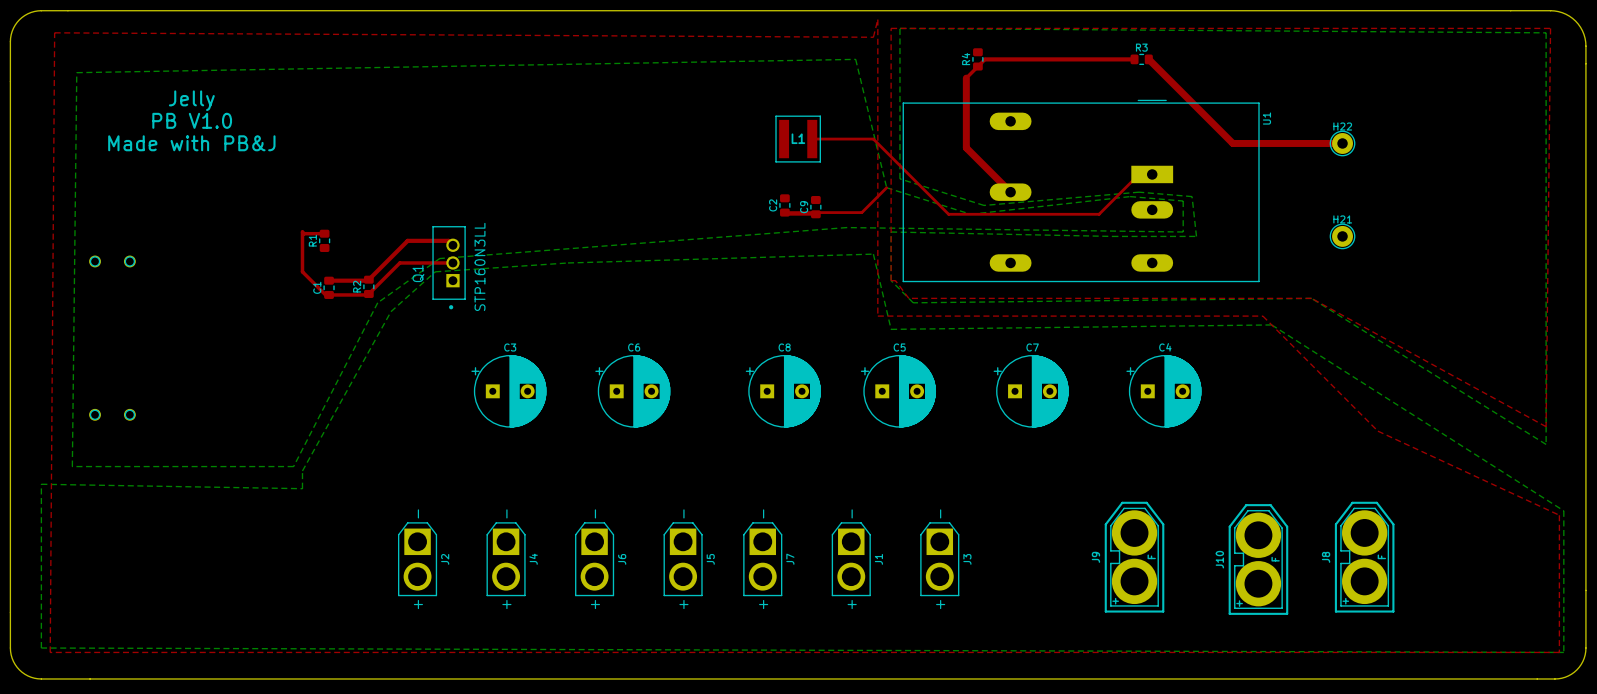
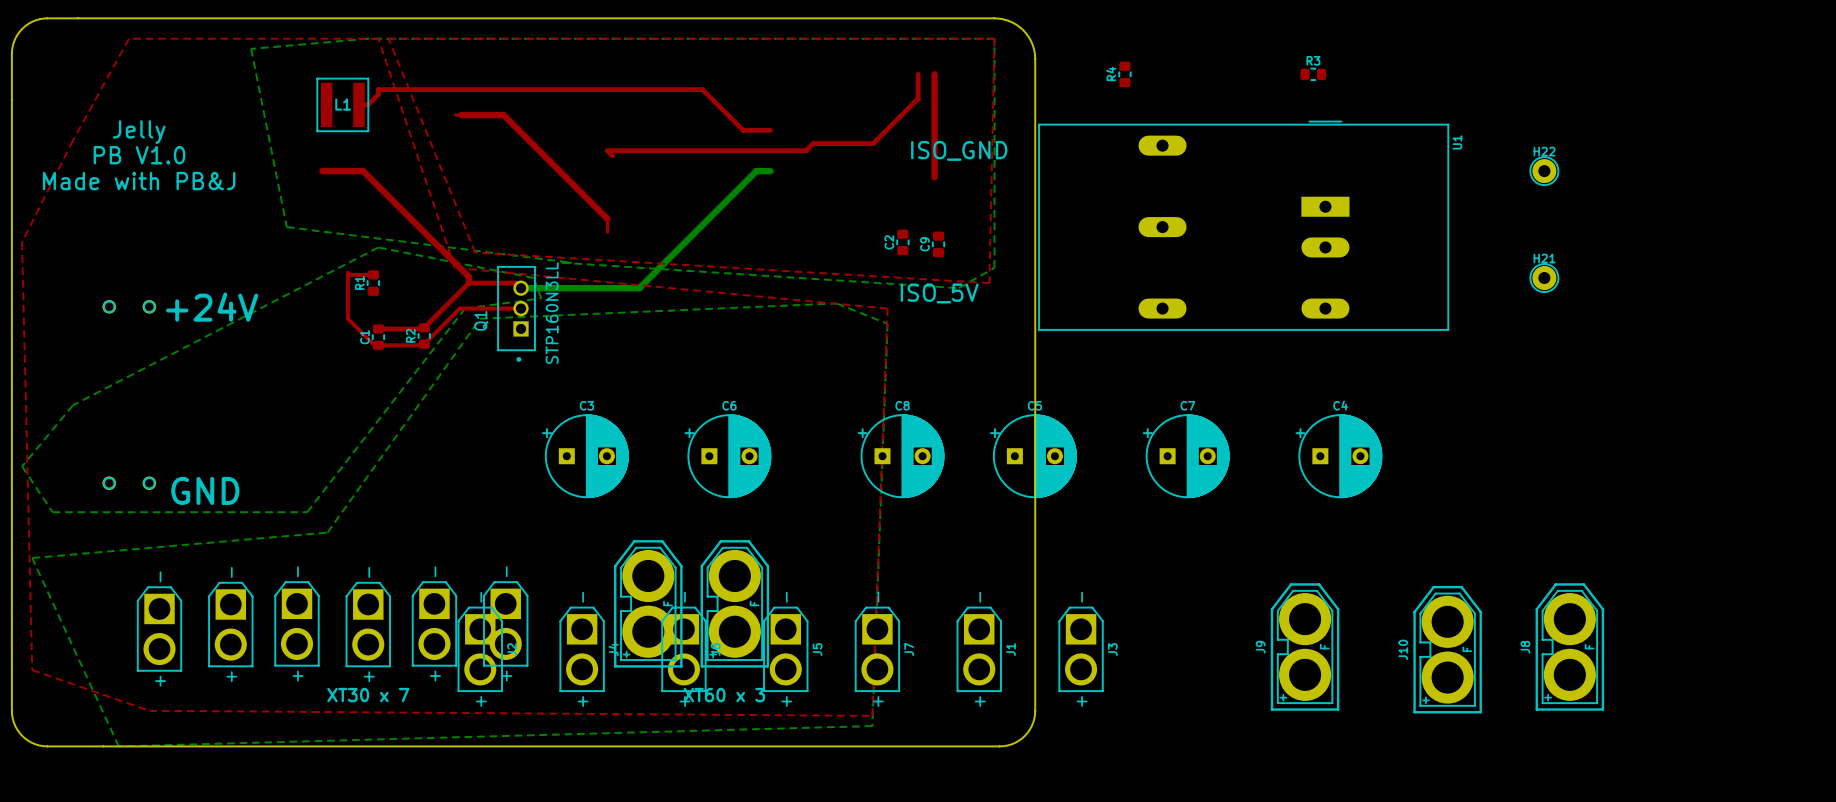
board edge: (864, 10) (1550, 10) (1565, 14) (1575, 21) (1583, 34) (1585, 46) (1585, 648) (1582, 661) (1576, 669) (1565, 677) (1554, 679) (41, 679) (24, 674) (13, 661) (10, 651) (10, 612) -> (994, 18) (1007, 20) (1023, 30) (1031, 41) (1035, 59) (1035, 710) (1031, 726) (1021, 738) (1011, 744) (999, 746) (47, 746)
top zone outline: (877, 19) (877, 316) (1262, 316) (1377, 431) (1559, 515) (1559, 652) (50, 652) (54, 32) (873, 37) (877, 19) -> none
top zone outline: none -> (128, 38) (378, 38) (454, 267) (887, 308) (872, 715) (149, 710) (32, 670) (22, 242) (72, 140) (128, 38)
bottom zone outline: none -> (368, 38) (994, 38) (994, 267) (958, 288) (561, 262) (571, 262) (286, 227) (251, 48) (368, 38)
top zone outline: none -> (388, 38) (994, 38) (989, 283) (475, 252) (388, 38)
top zone outline: (891, 28) (891, 280) (895, 280) (908, 298) (1311, 298) (1546, 426) (1550, 28) (891, 28) -> none
bottom zone outline: (899, 28) (899, 178) (984, 205) (1138, 192) (1192, 196) (1196, 236) (891, 232) (891, 280) (913, 302) (1311, 298) (1546, 444) (1546, 32) (899, 28) -> none
top track: none -> (918, 74) (918, 98) (873, 143) (813, 143) (806, 150) (607, 150) (612, 155)
top track: none -> (934, 74) (934, 177)
bottom zone outline: (855, 59) (76, 72) (72, 466) (293, 466) (377, 302) (439, 258) (846, 227) (1183, 232) (1183, 201) (1130, 196) (970, 214) (886, 187) (855, 59) -> none
top track: (1134, 59) (985, 59) (966, 78) (966, 147) (1010, 192) -> none
top track: (1148, 59) (1232, 143) (1342, 143) -> none
top track: none -> (359, 104) (367, 104) (378, 94) (378, 89) (702, 89) (743, 130) (770, 130)
top track: none -> (455, 115) (503, 115) (607, 218) (607, 232)
text position: Jelly (191, 100) -> Jelly (139, 132)
text position: PB V1.0 (192, 120) -> PB V1.0 (139, 155)
text: none -> ISO_GND (959, 150)
L1 position: (798, 139) -> (342, 104)
top track: (812, 139) (873, 139) (948, 214) (1099, 214) (1138, 174) (1152, 174) -> none
text position: Made with PB&J (191, 143) -> Made with PB&J (139, 181)
top track: none -> (322, 171) (363, 171) (468, 276) (468, 283)
bottom track: none -> (770, 171) (756, 171) (639, 288) (521, 288)
top track: (886, 187) (861, 212) (784, 212) (786, 214) (815, 214) -> none
bottom zone outline: none -> (378, 247) (533, 278) (541, 298) (465, 308) (307, 512) (52, 512) (22, 466) (72, 405) (378, 247)
text: none -> ISO_5V (939, 293)
bottom zone outline: (873, 254) (568, 262) (435, 271) (391, 311) (302, 470) (302, 488) (41, 484) (41, 648) (1563, 652) (1563, 510) (1271, 324) (891, 329) (873, 254) -> none
bottom zone outline: none -> (836, 303) (480, 318) (327, 532) (32, 558) (118, 746) (872, 726) (887, 323) (836, 303)
text: none -> +24V (212, 307)
text: none -> GND (205, 490)
part: none -> (648, 603)
part: none -> (734, 603)
part: none -> (230, 624)
part: none -> (296, 623)
part: none -> (368, 624)
part: none -> (434, 623)
part: none -> (505, 623)
part: none -> (159, 629)
text: none -> XT30 x 7 (368, 695)
text: none -> XT60 x 3 (724, 695)
board edge: none -> (11, 710) (15, 726) (22, 735) (35, 744) (47, 746)

